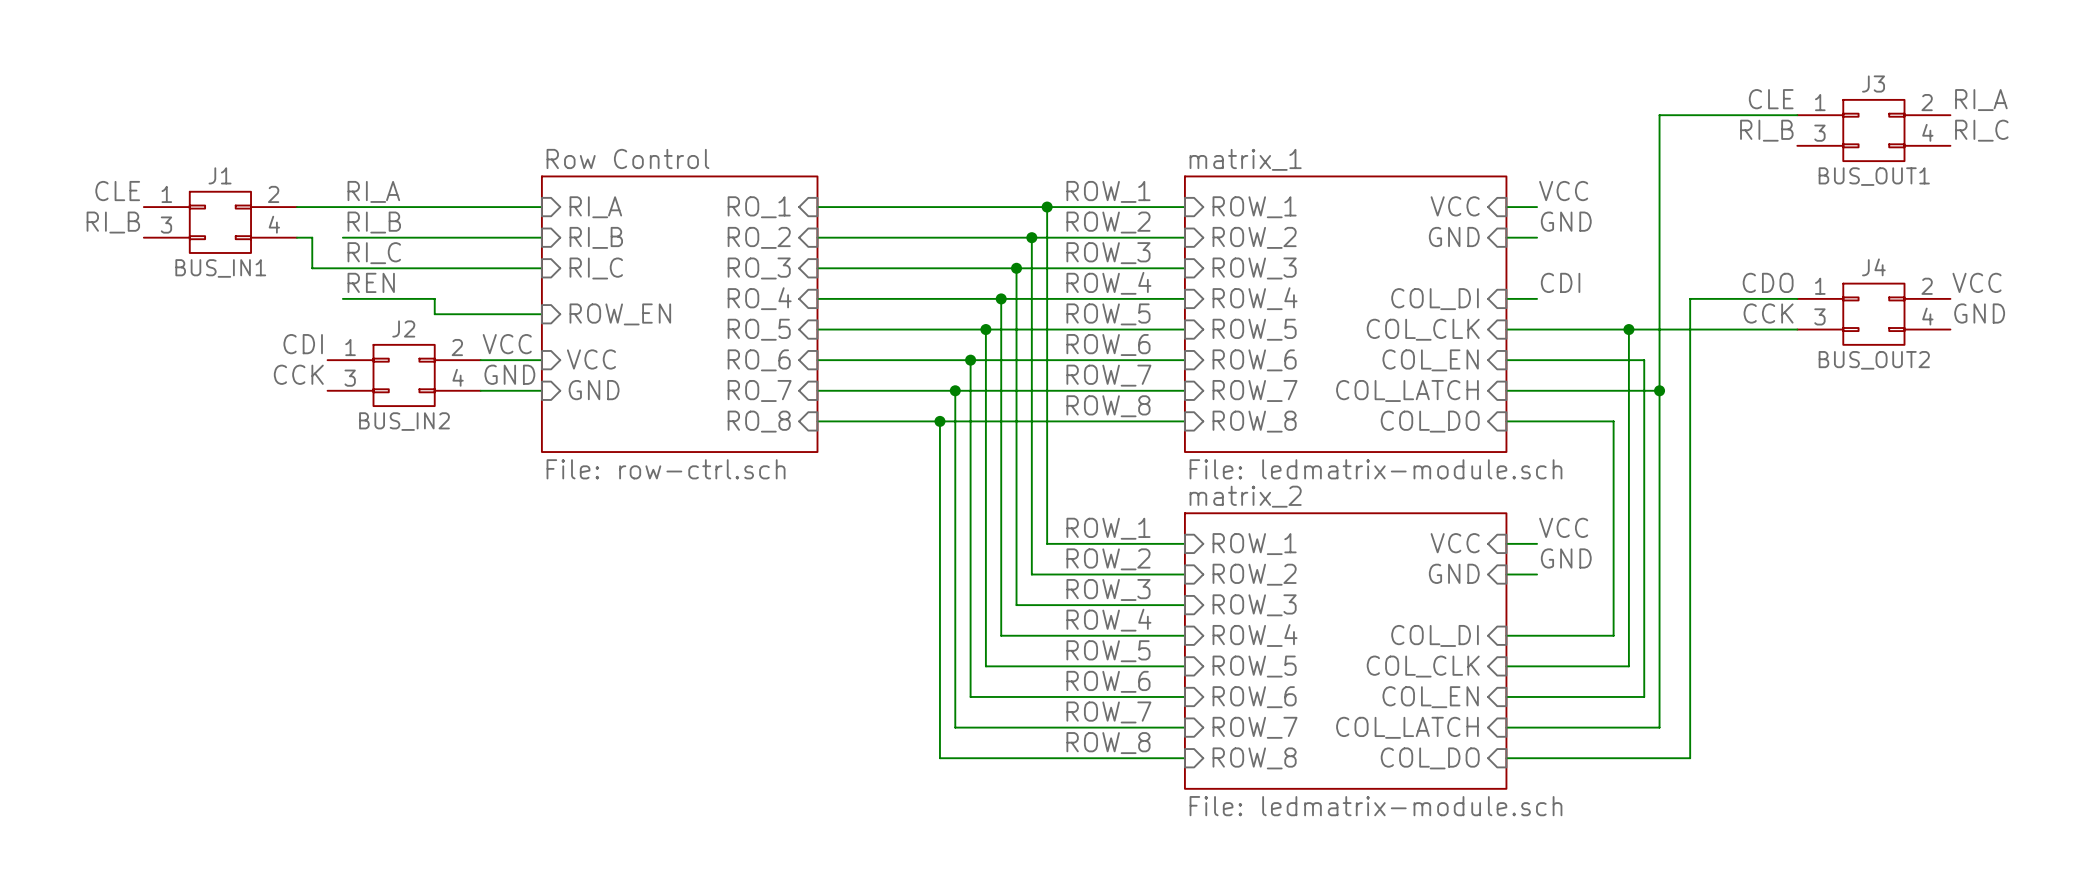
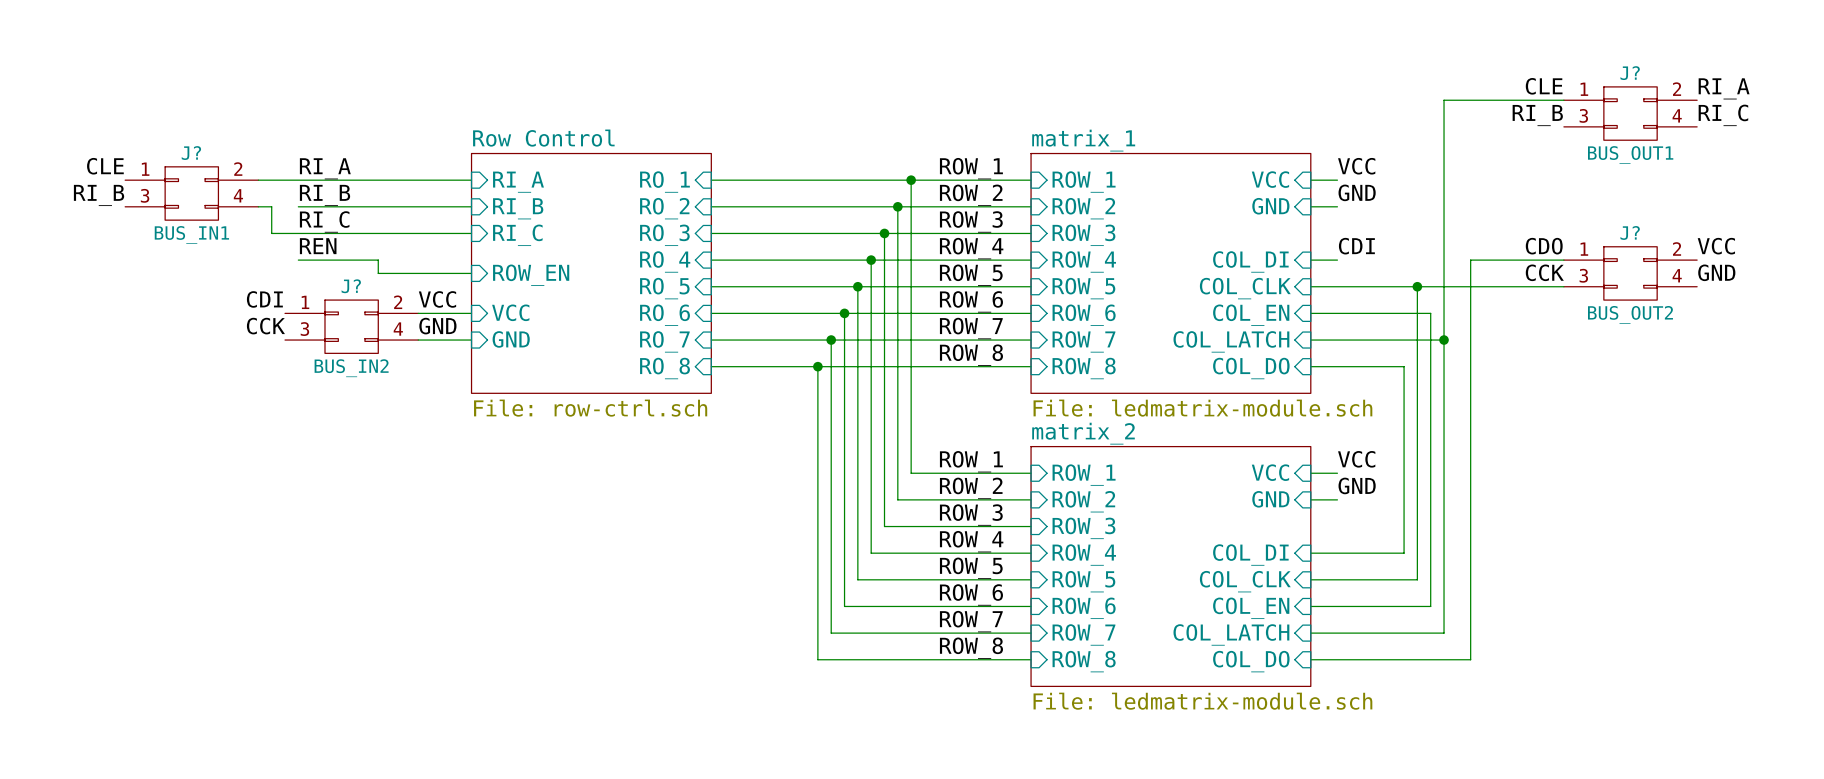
J3 name: J3 (1873, 84) -> J? (1630, 73)
J1 name: J1 (220, 175) -> J? (191, 153)
J4 name: J4 (1873, 267) -> J? (1630, 232)
J2 name: J2 (403, 328) -> J? (351, 286)

